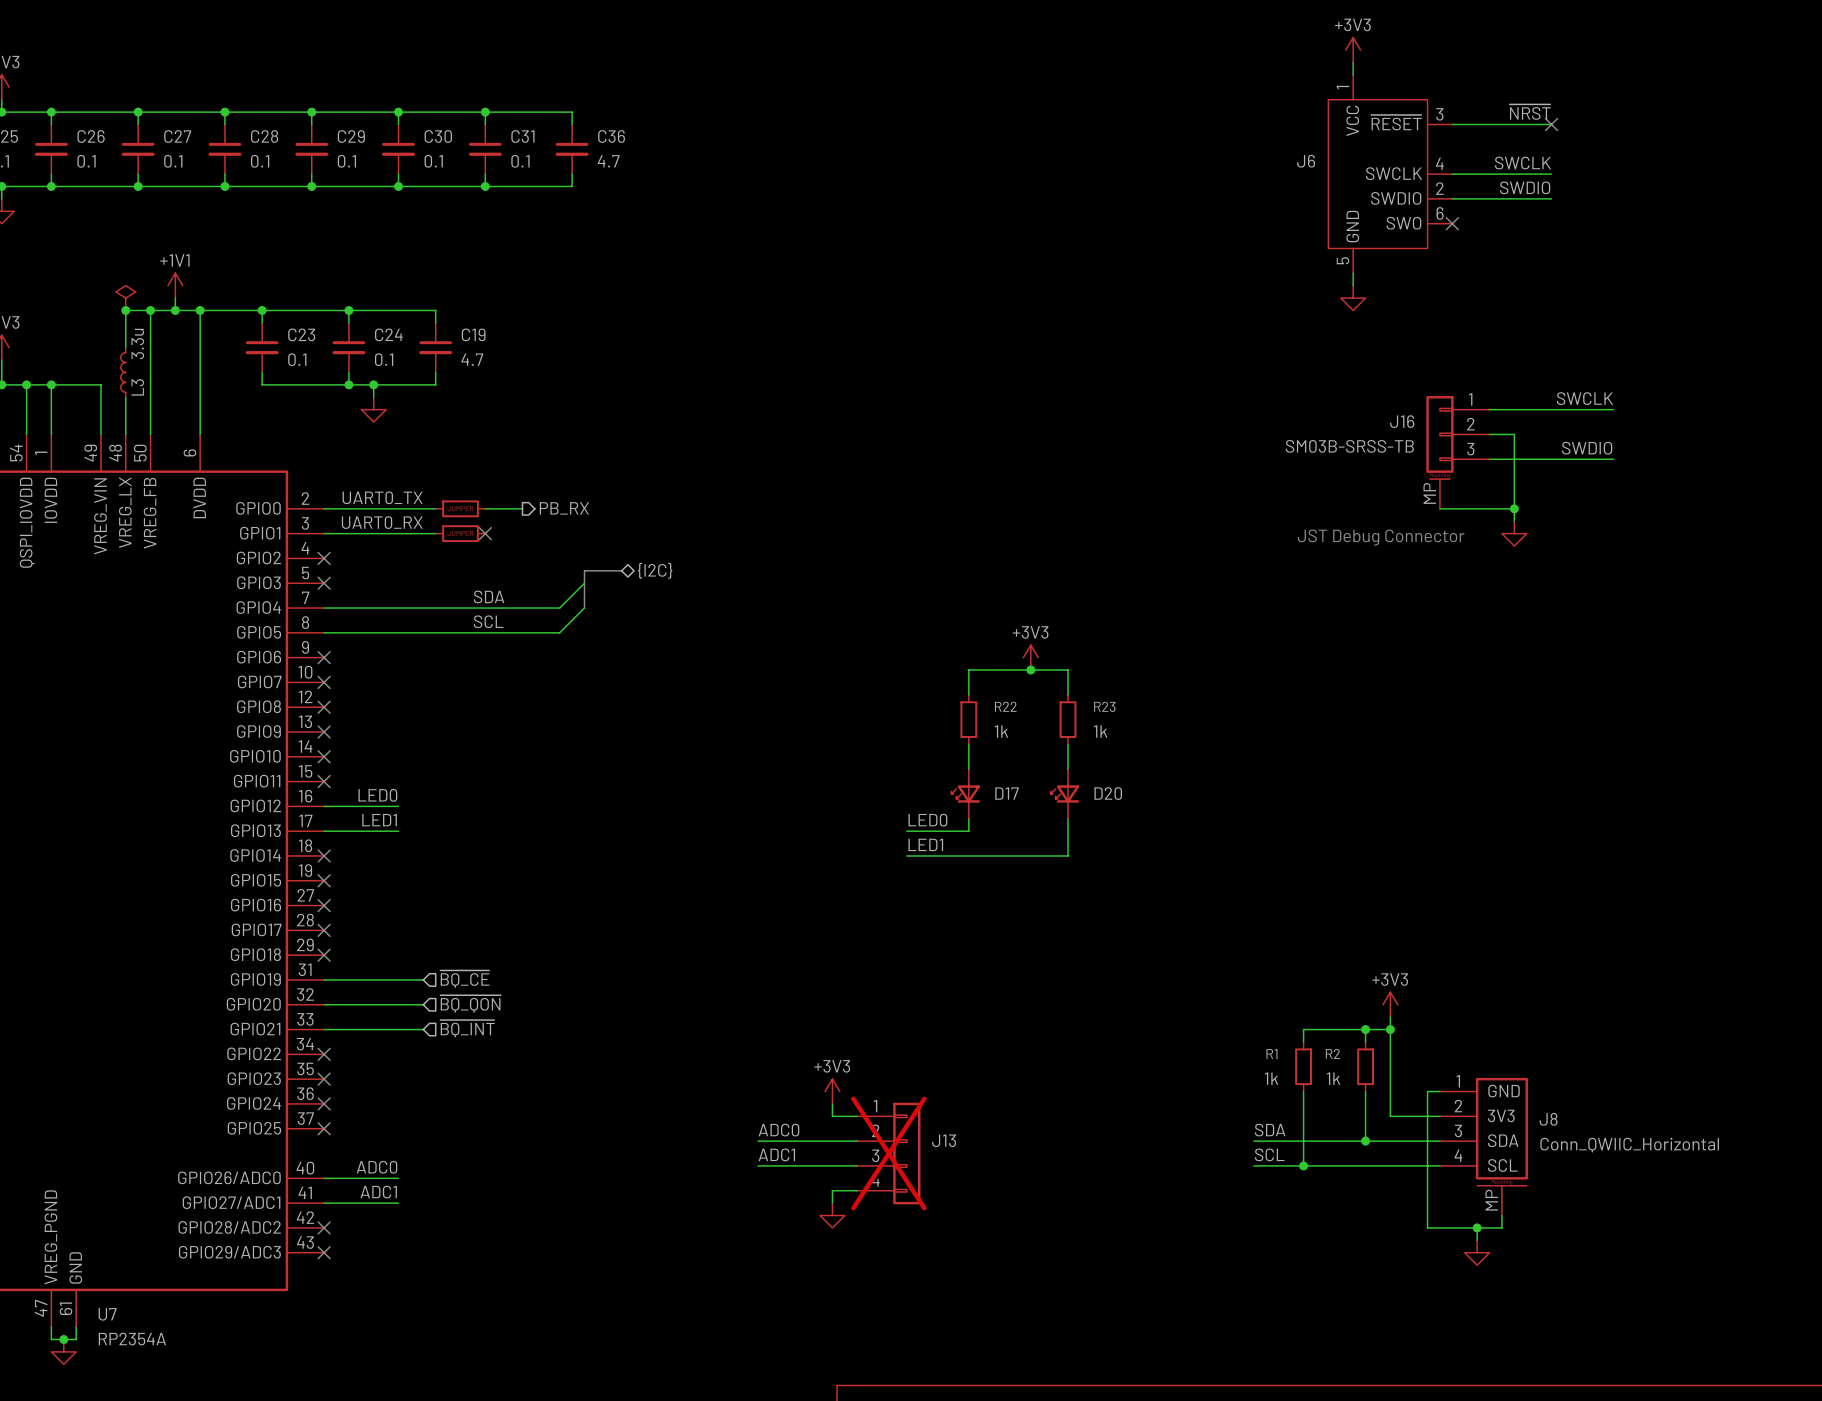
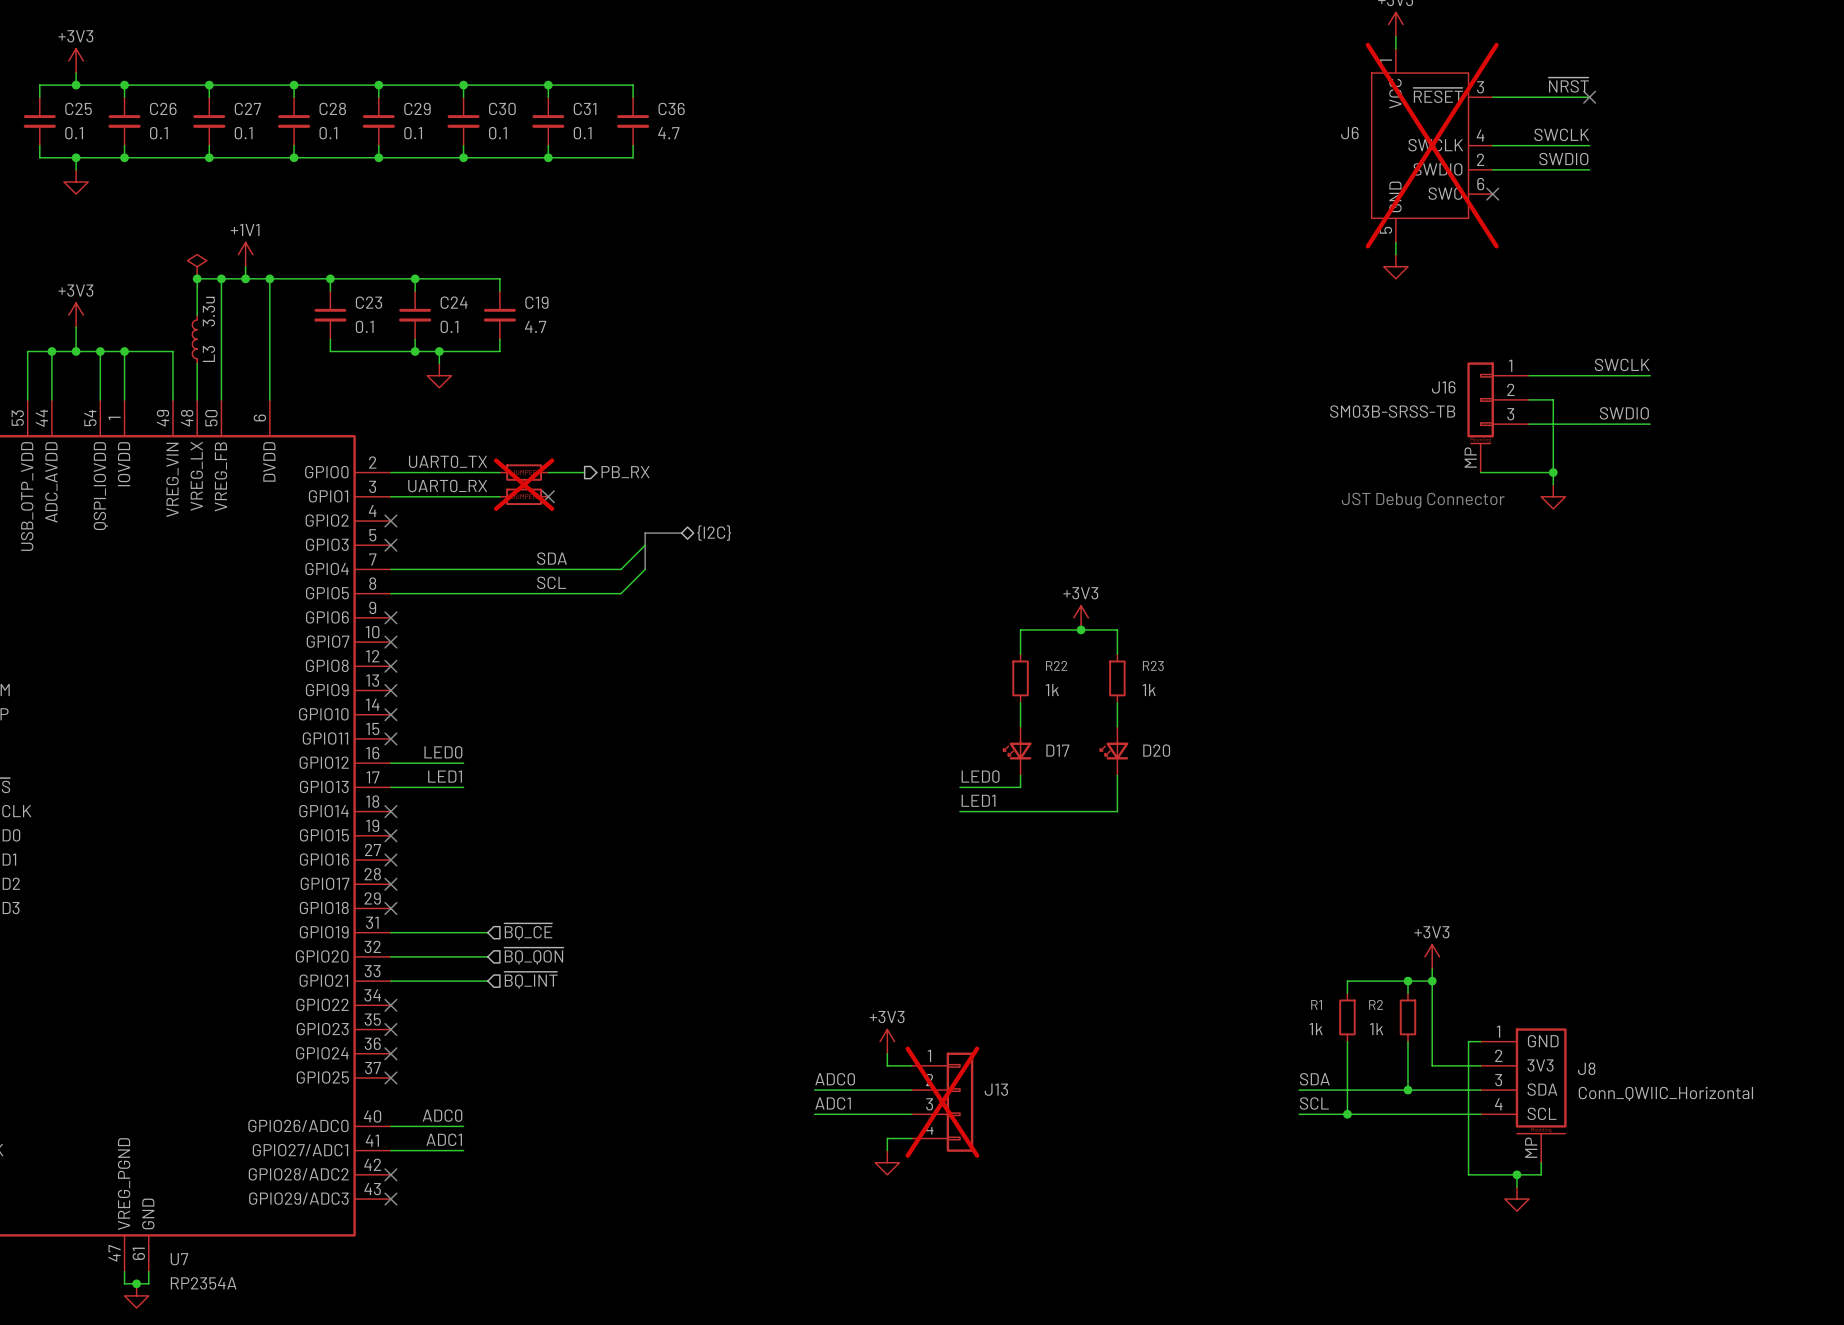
J6 do-not-place cross: none -> (1432, 145)
part do-not-place cross: none -> (524, 484)

